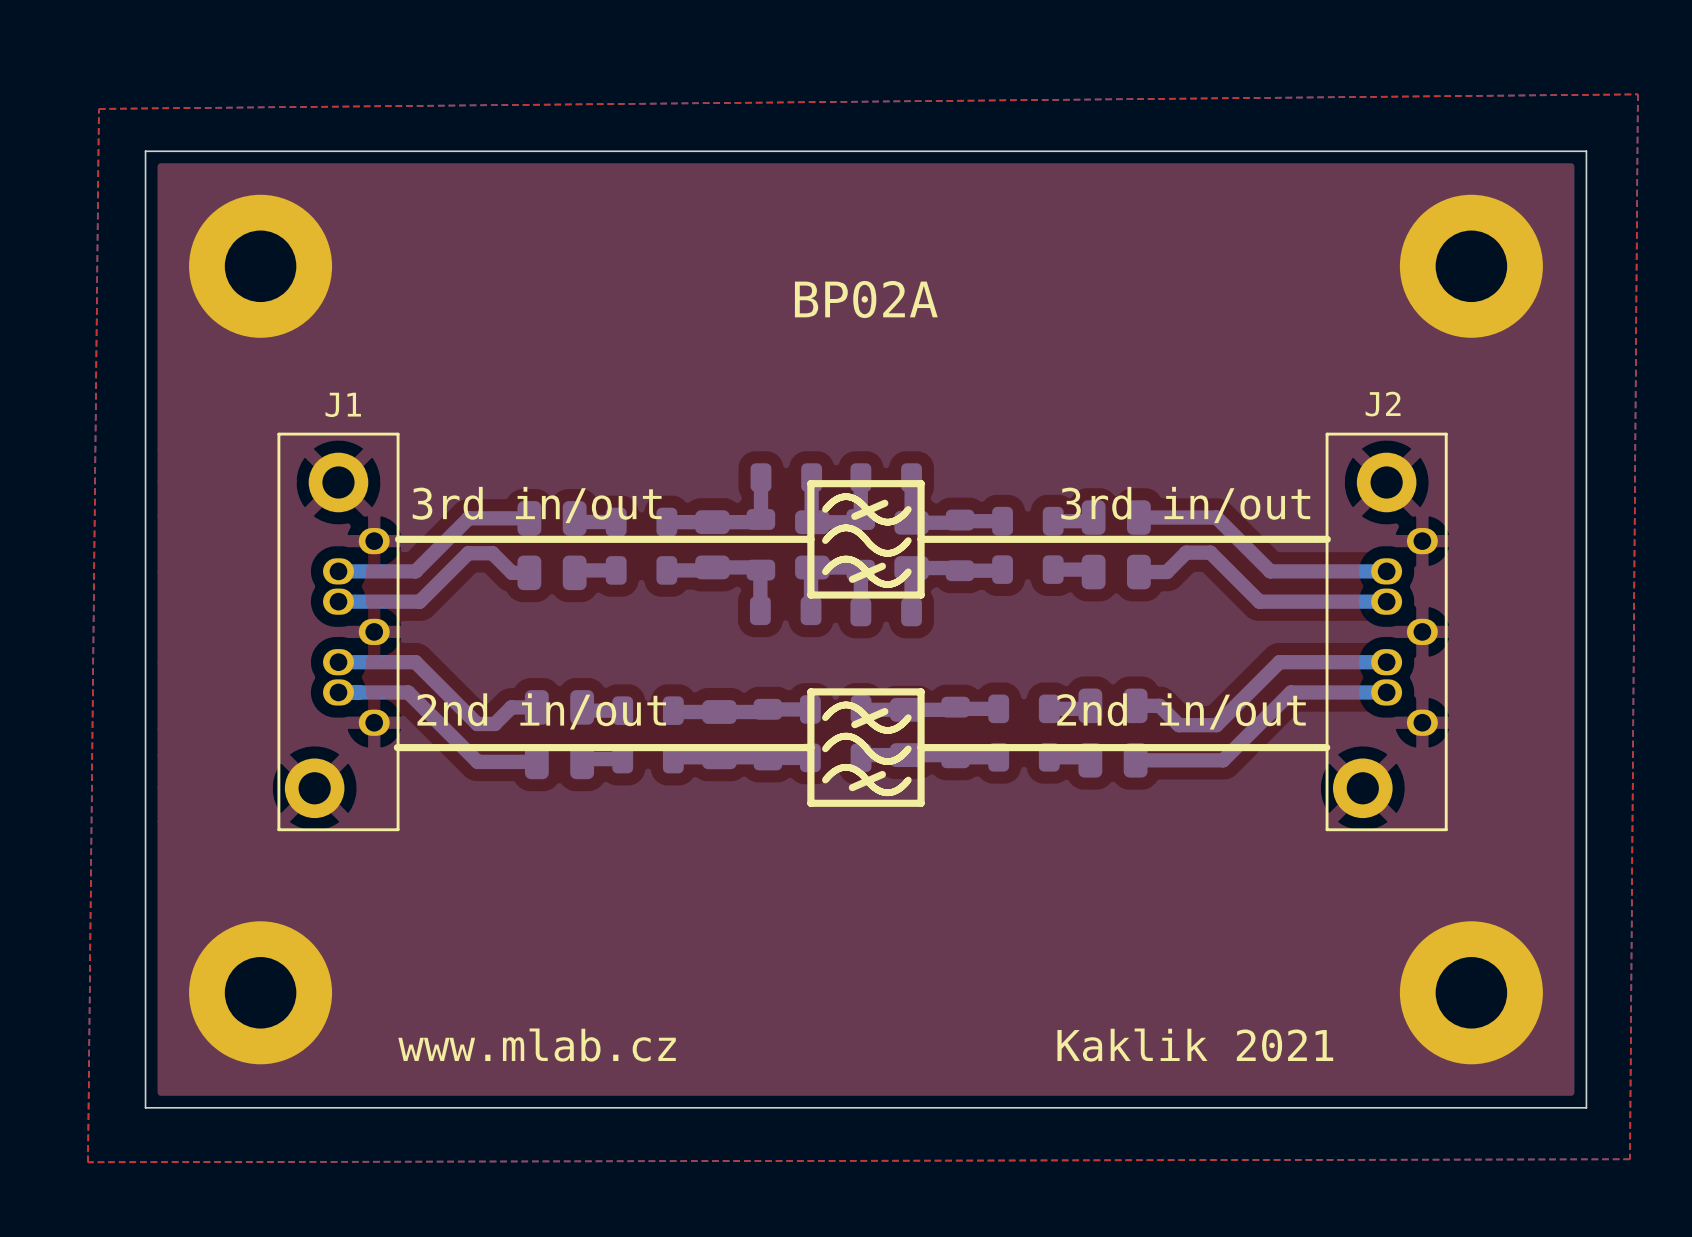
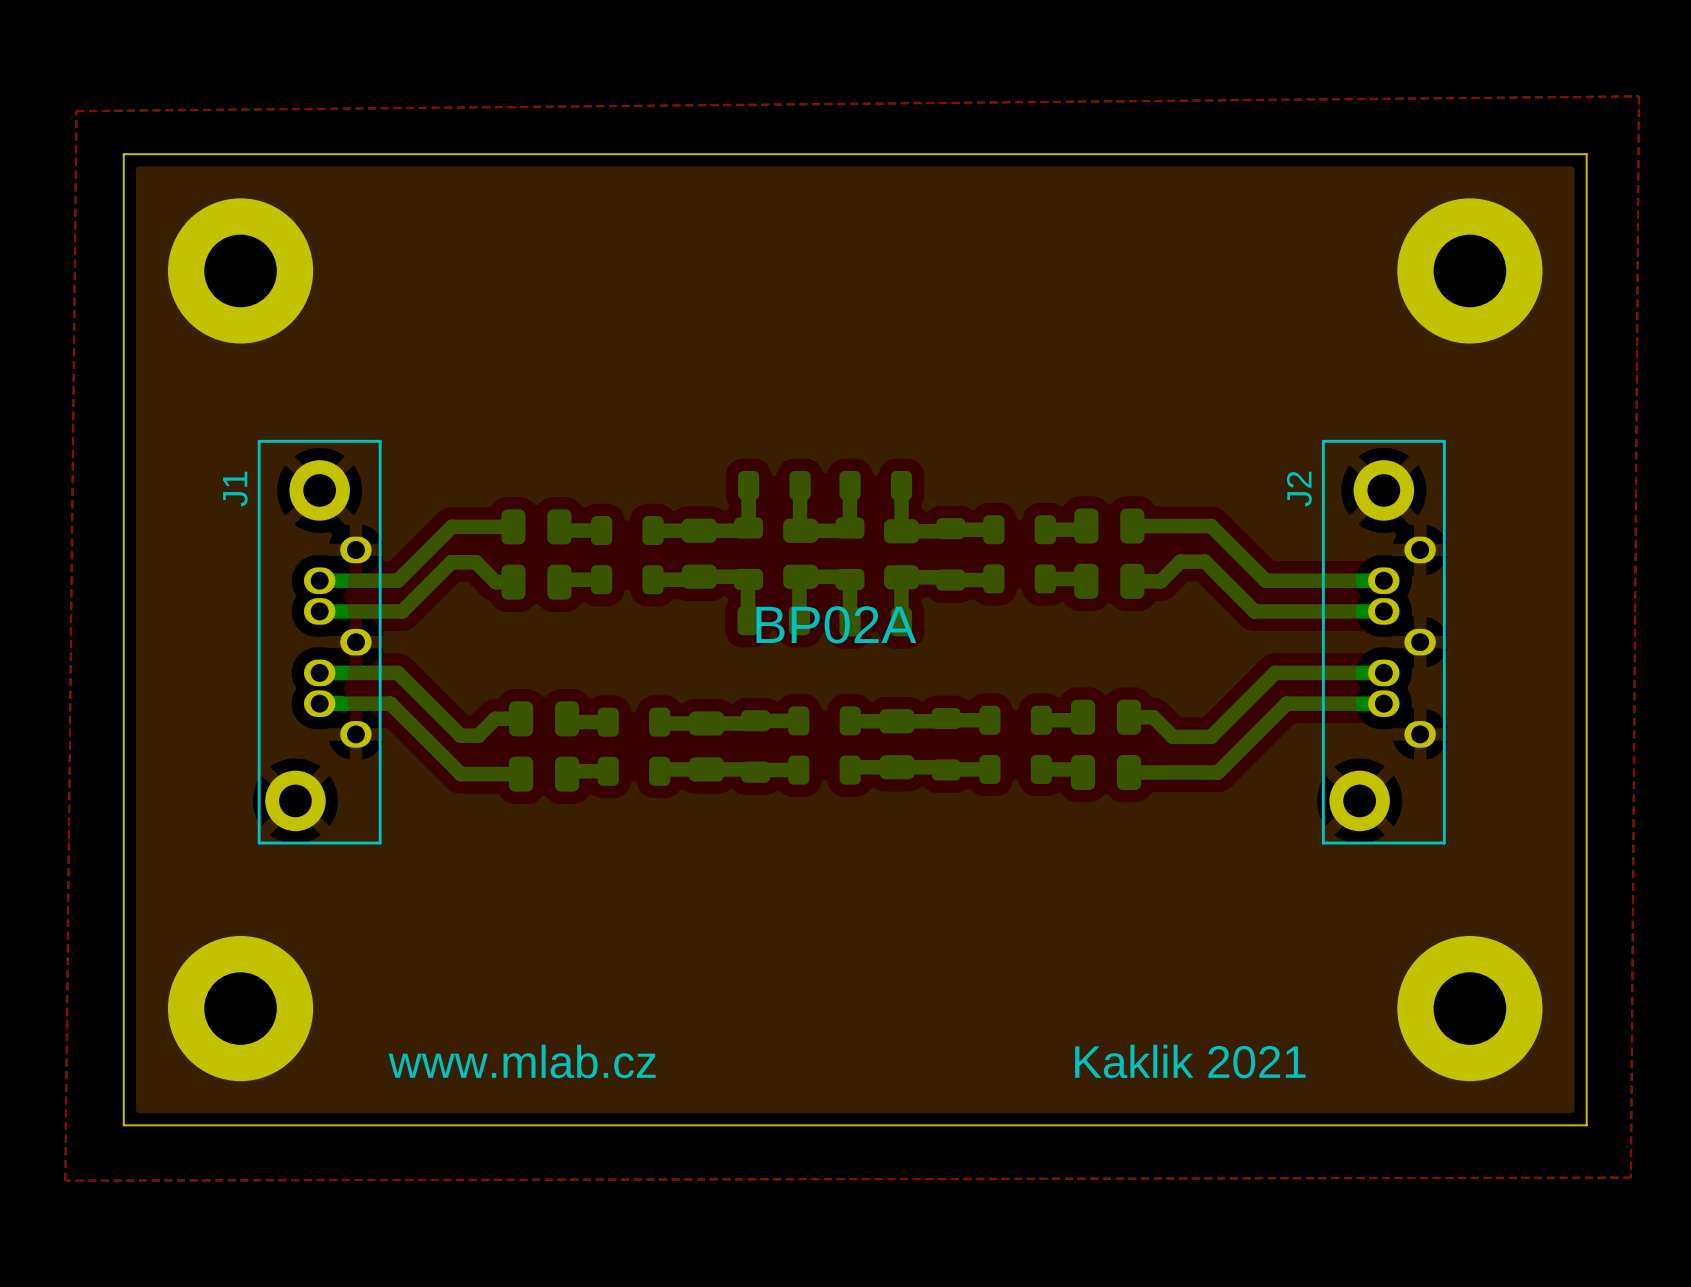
text position: BP02A (866, 299) -> BP02A (836, 624)
J1 name rotation: 0° (343, 404) -> 90° counterclockwise (235, 489)
J1 name position: J1 (343, 404) -> J1 (235, 489)
J2 name rotation: 0° (1383, 404) -> 90° counterclockwise (1299, 489)
J2 name position: J2 (1383, 404) -> J2 (1299, 489)
line: (810, 483) (921, 483) (921, 595) (810, 595) (810, 483) -> none
line: (884, 503) (854, 516) -> none
text: 3rd in/out (537, 504) -> none
text: 3rd in/out (1185, 504) -> none
line: (825, 509) (835, 500) (845, 496) (857, 500) (873, 516) (884, 521) (895, 520) (908, 509) -> none
line: (398, 539) (810, 539) -> none
line: (921, 539) (1327, 539) -> none
line: (825, 540) (835, 531) (845, 527) (857, 531) (873, 547) (884, 552) (895, 551) (908, 540) -> none
line: (882, 566) (852, 579) -> none
line: (825, 571) (835, 562) (845, 559) (857, 562) (873, 578) (884, 584) (895, 582) (908, 571) -> none
line: (810, 691) (810, 803) (921, 803) (921, 691) (810, 691) -> none
text: 2nd in/out (541, 711) -> none
line: (884, 711) (854, 724) -> none
text: 2nd in/out (1181, 711) -> none
line: (825, 717) (835, 708) (845, 704) (857, 708) (873, 724) (884, 730) (895, 728) (908, 717) -> none
line: (397, 747) (810, 747) -> none
line: (921, 747) (1326, 747) -> none
line: (825, 748) (835, 739) (845, 736) (857, 739) (873, 755) (884, 761) (895, 759) (908, 748) -> none
line: (882, 774) (852, 787) -> none
line: (825, 780) (835, 770) (845, 767) (857, 771) (873, 786) (884, 792) (895, 790) (908, 780) -> none

